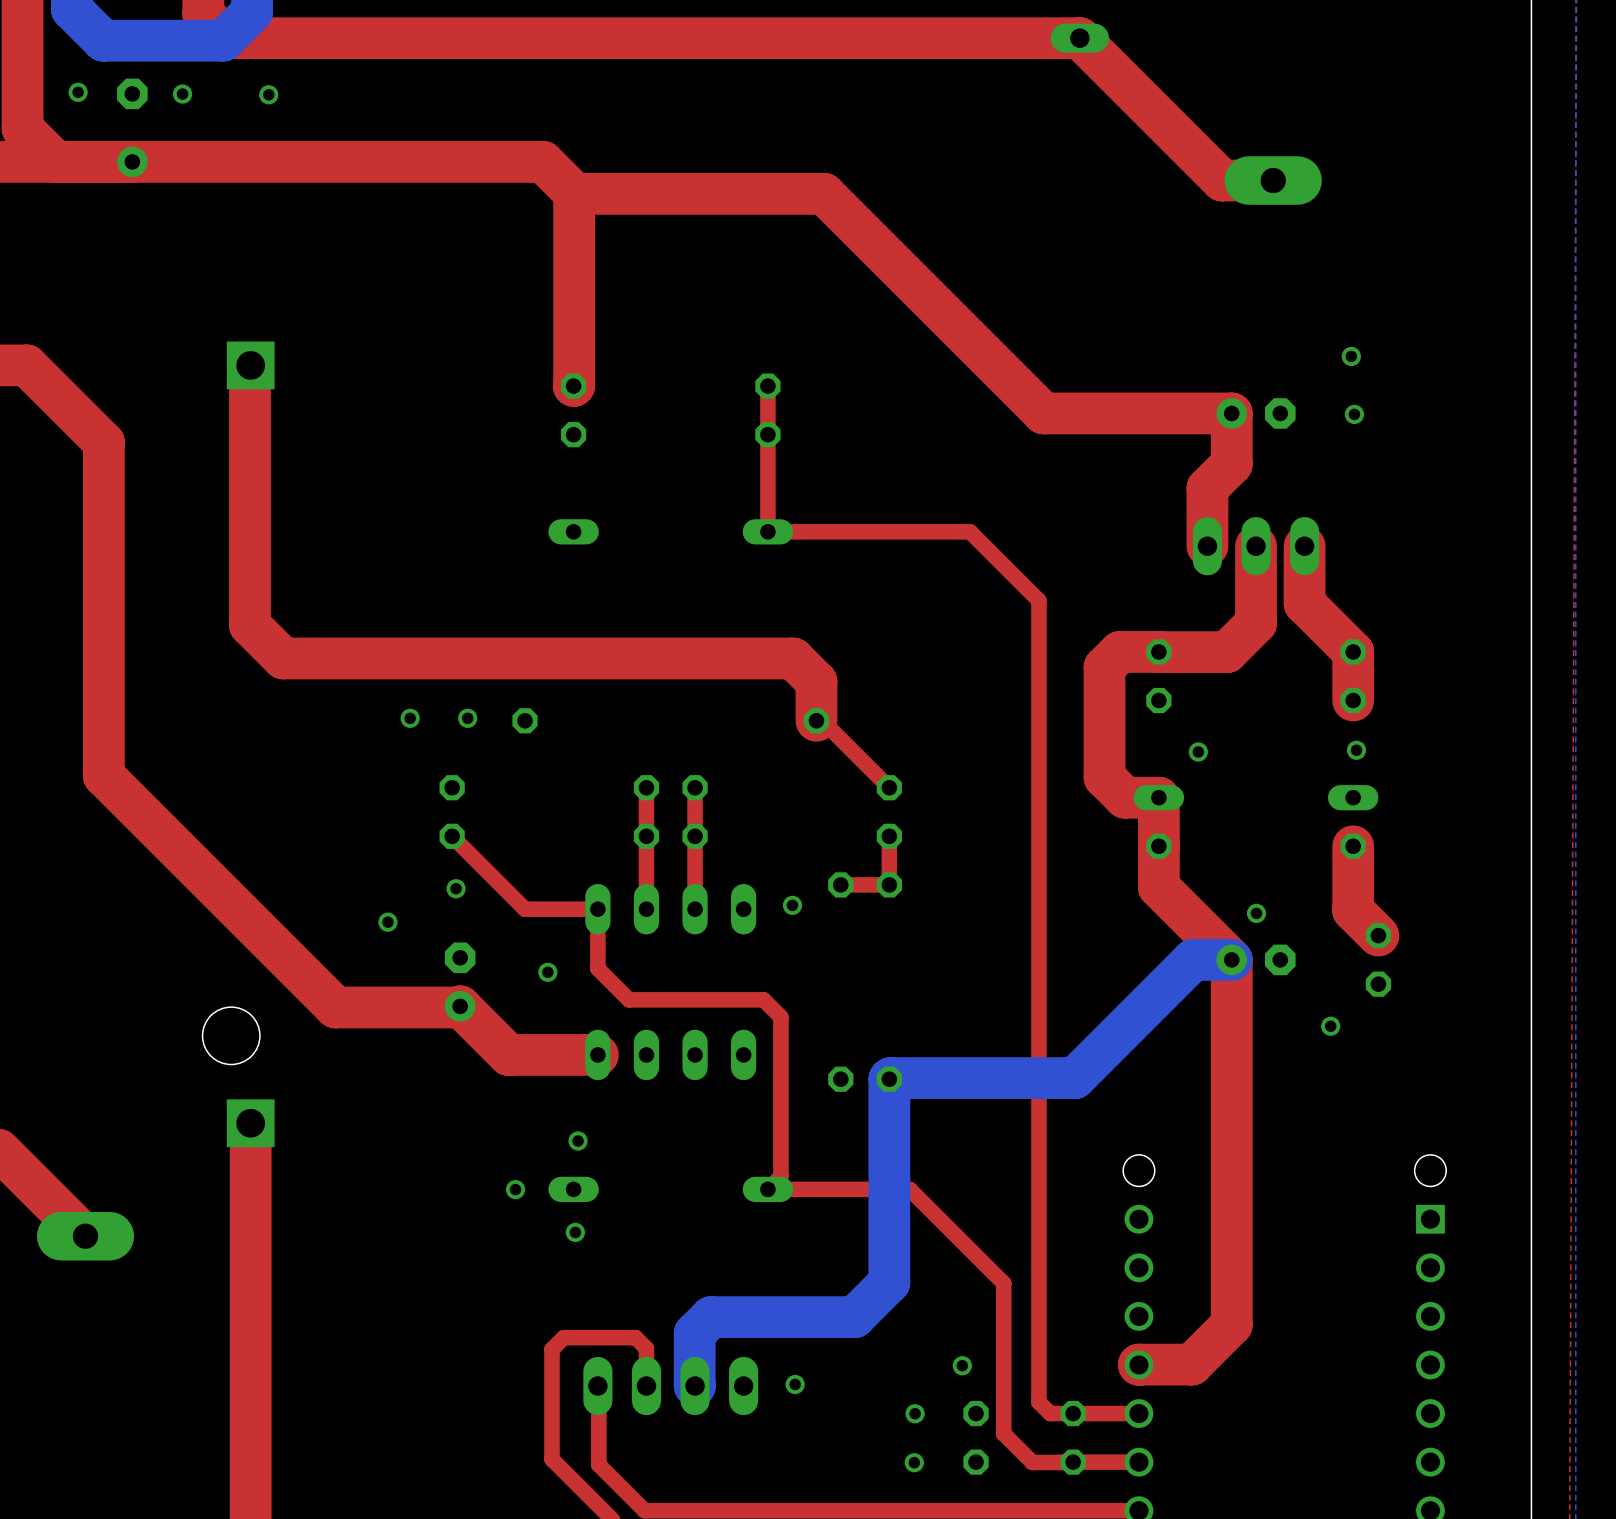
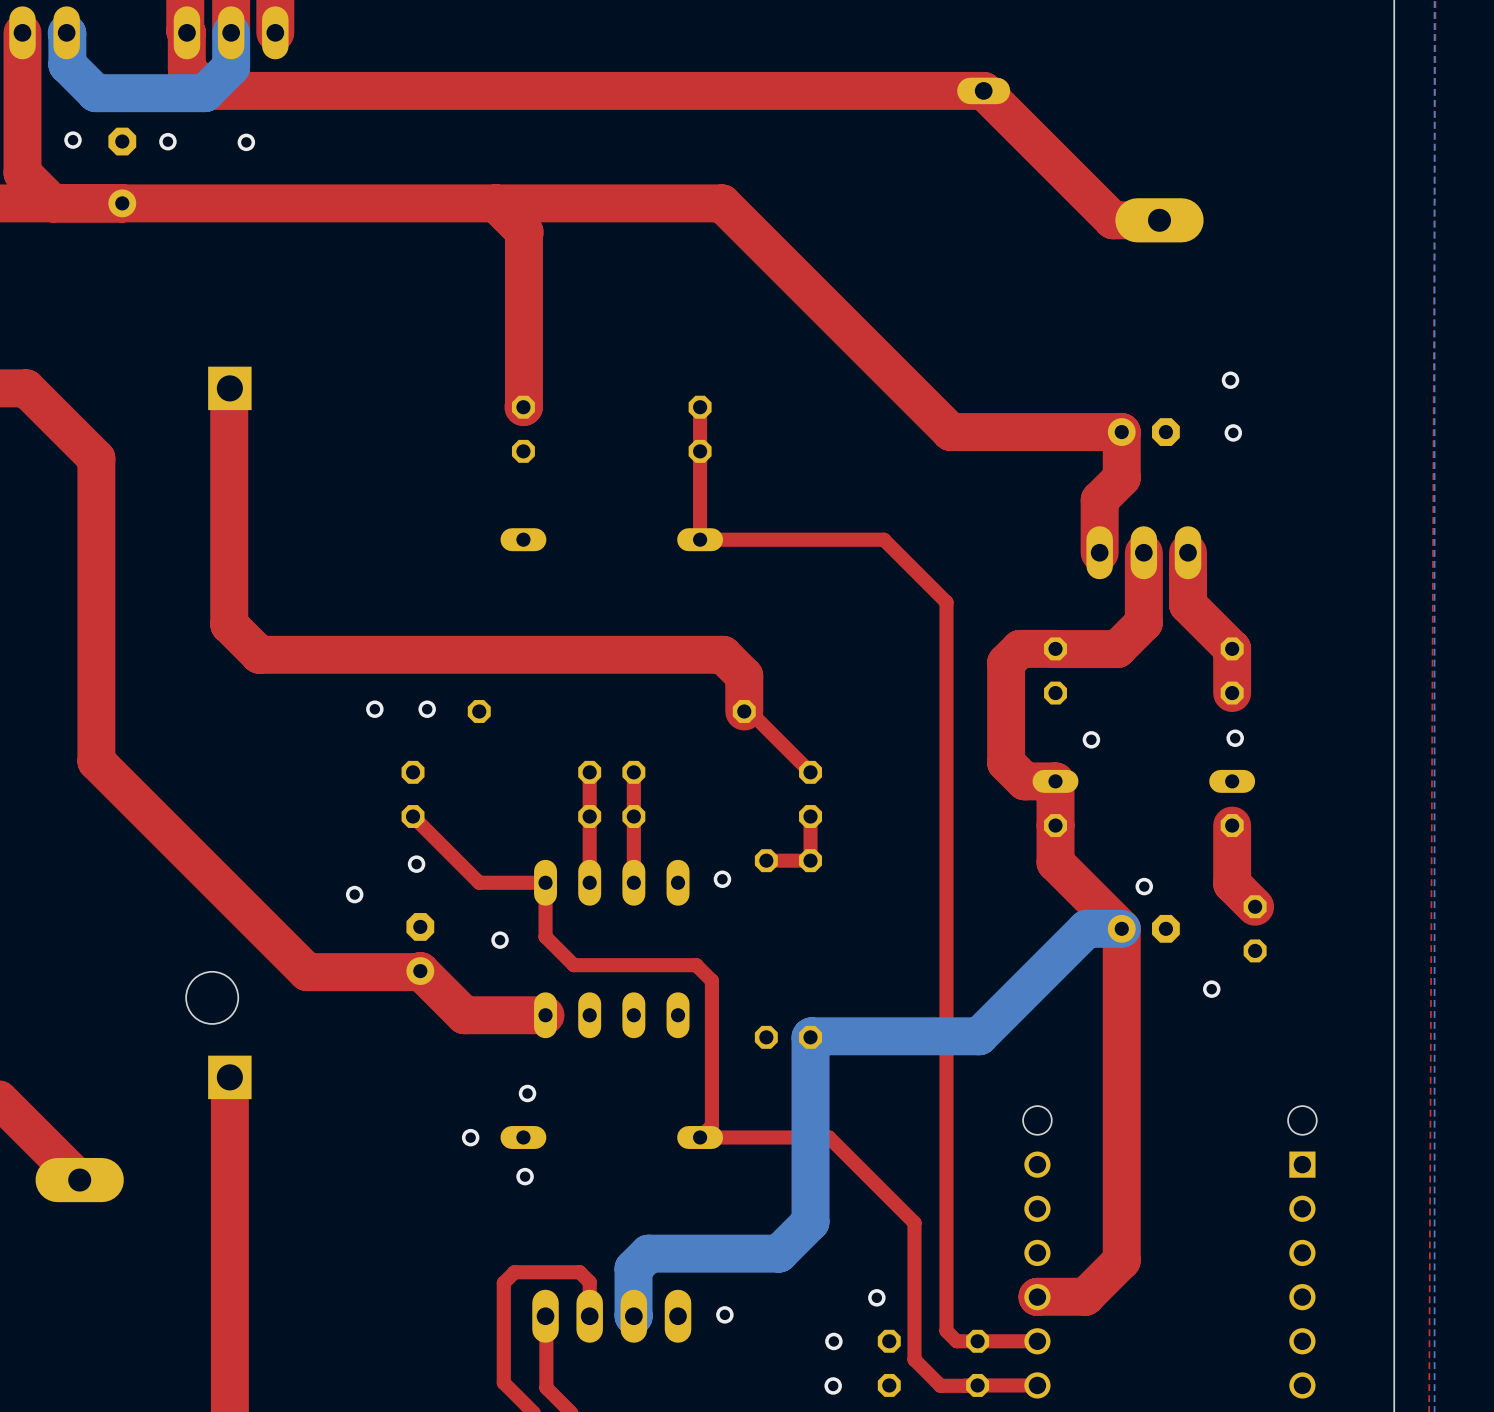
top track: (824, 193) (575, 193) -> (751, 232) (722, 203) (495, 203)

